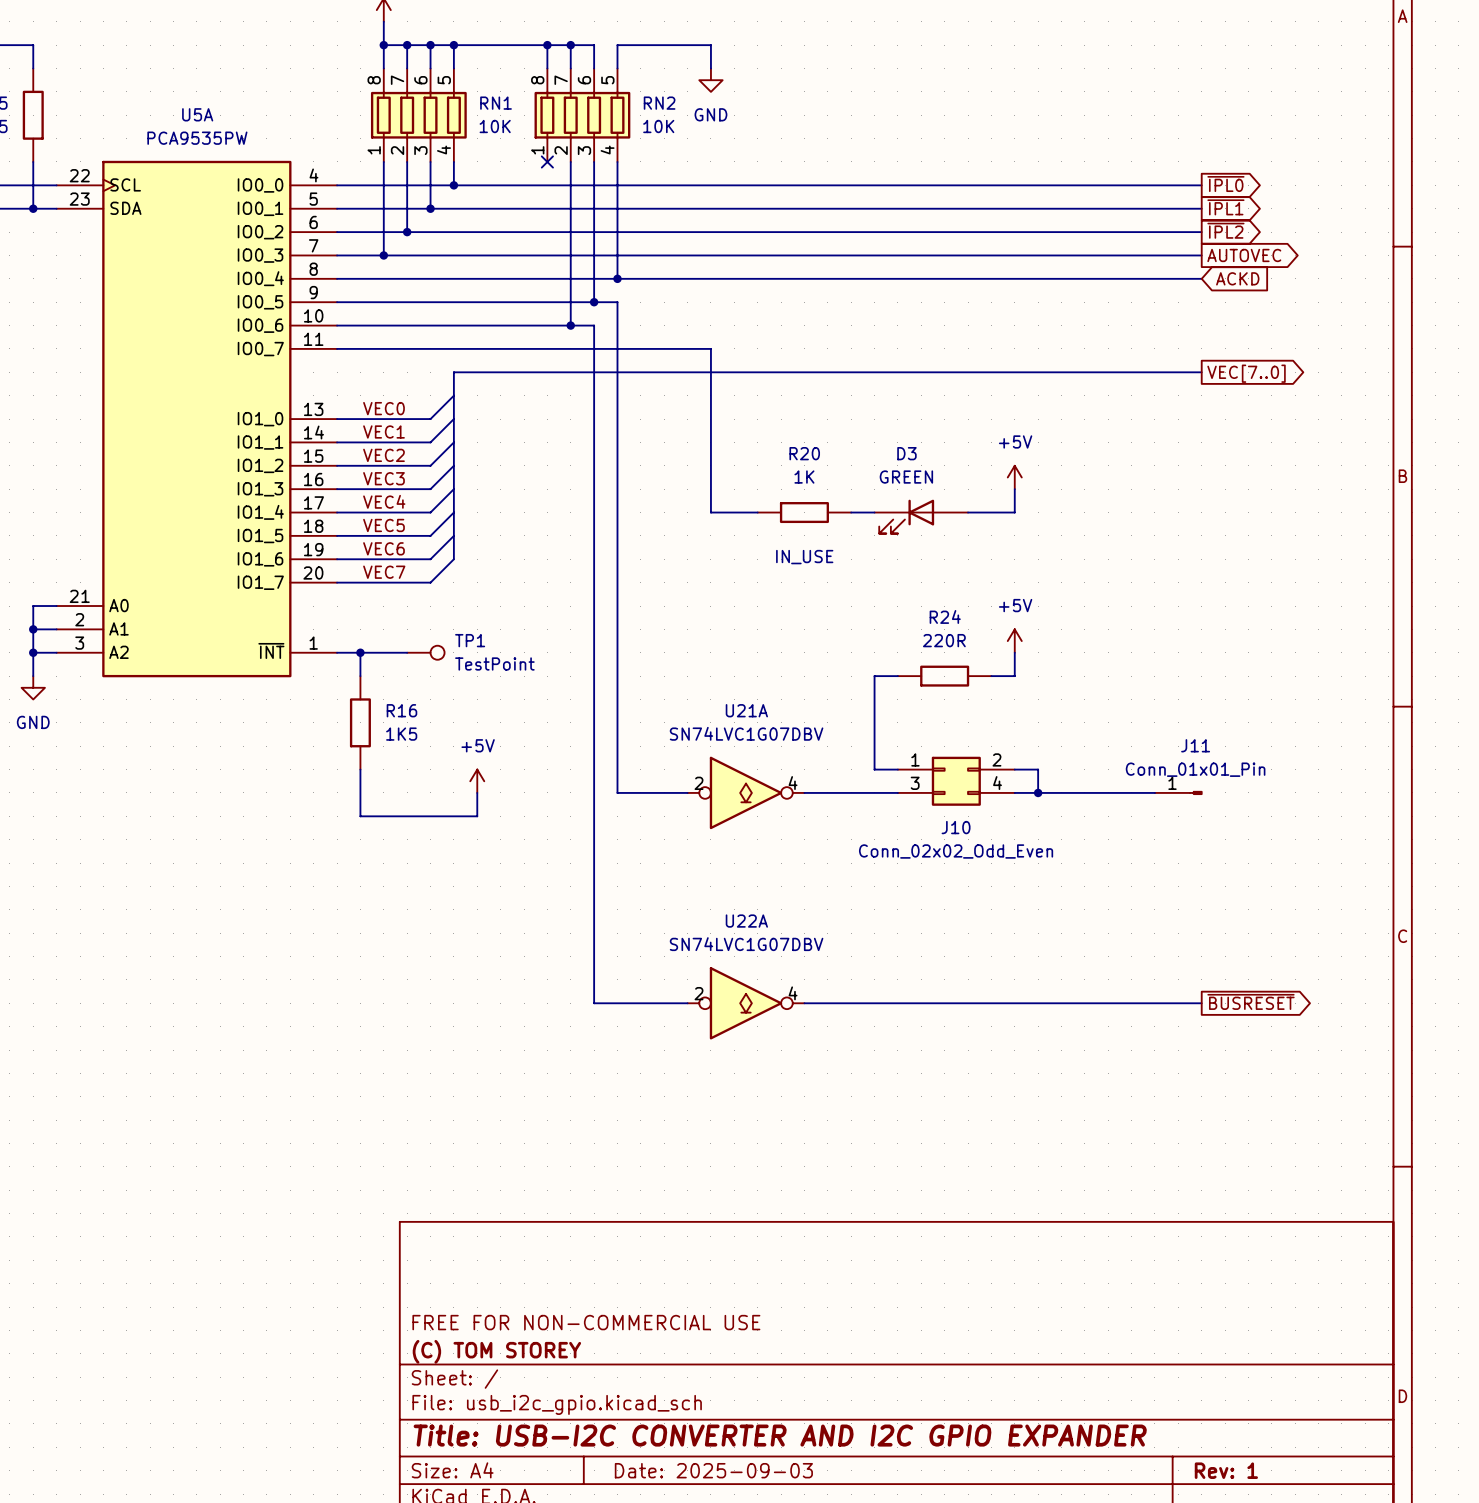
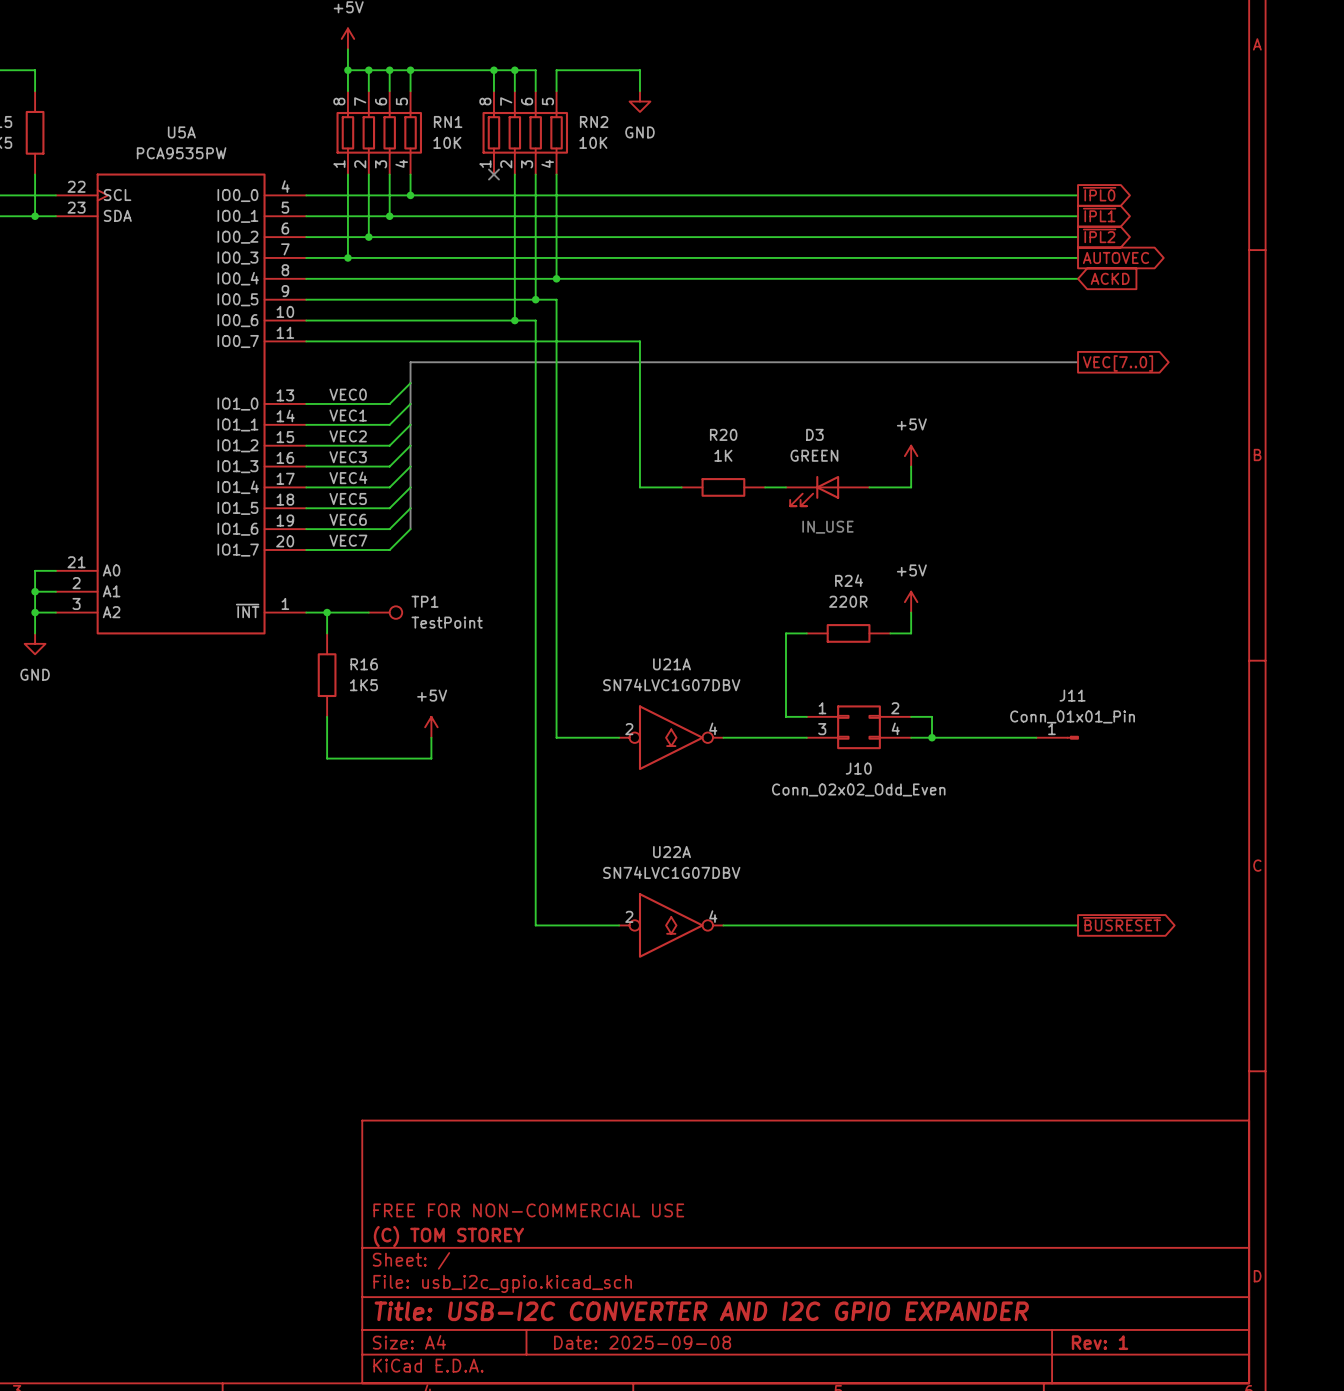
text position: IN_USE (804, 557) -> IN_USE (827, 527)
title block: Date: 2025-09-03 (713, 1470) -> Date: 2025-09-08 (642, 1342)

